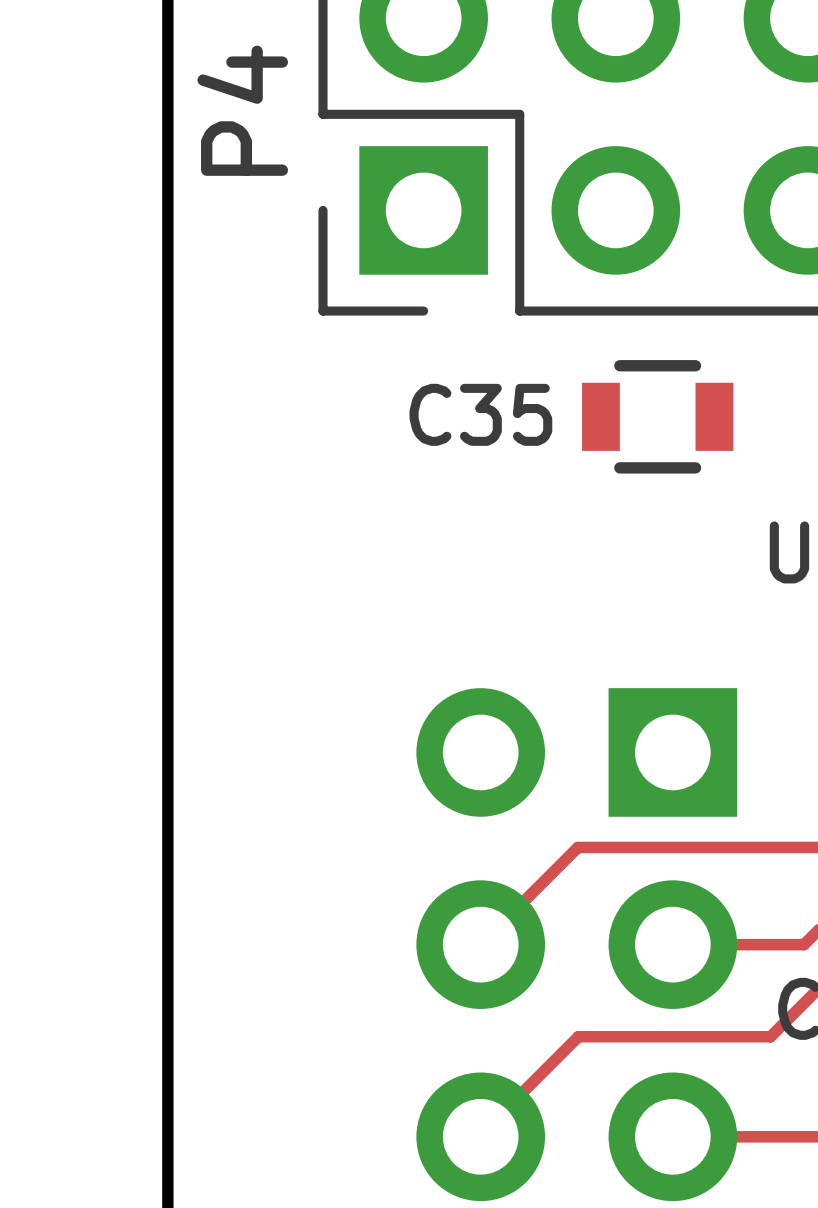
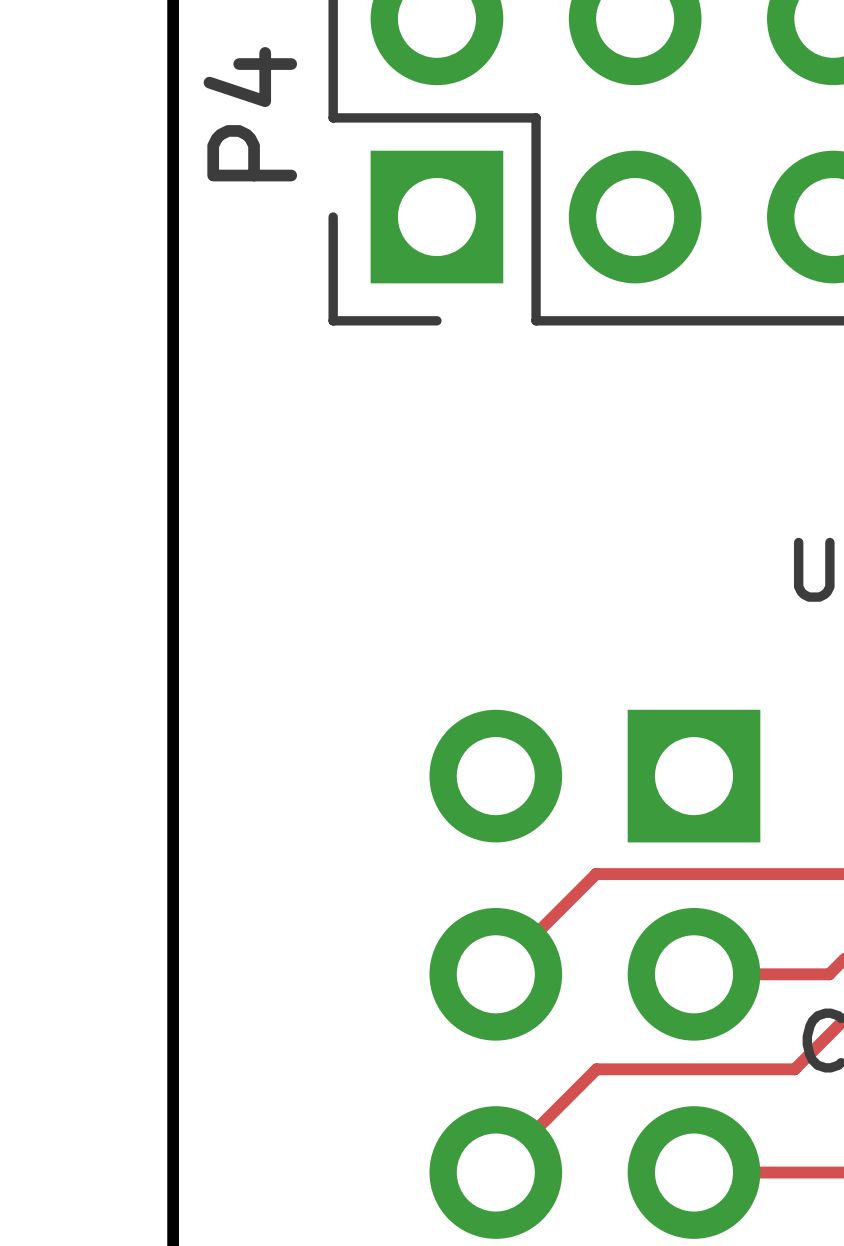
C35: (657, 416) -> none

